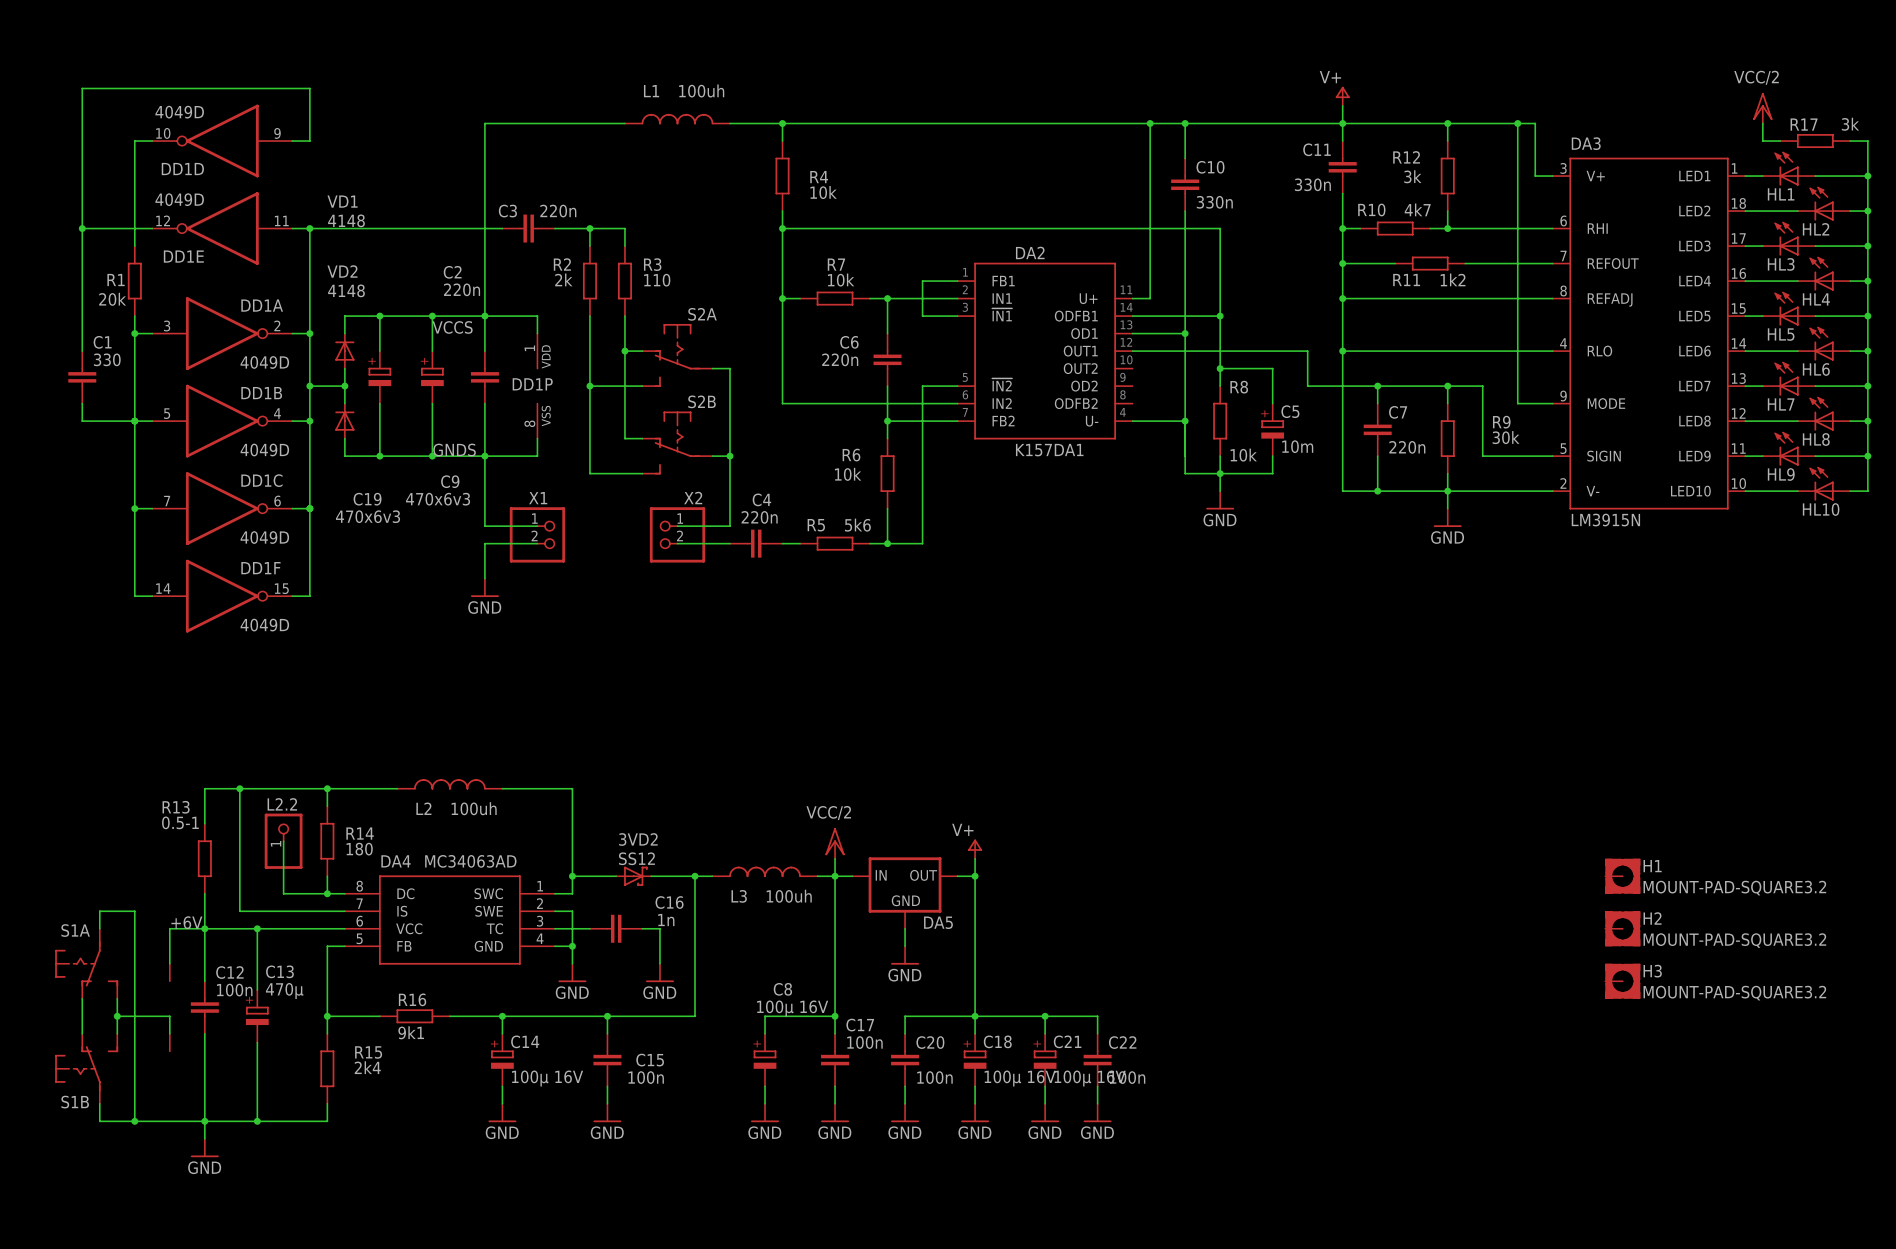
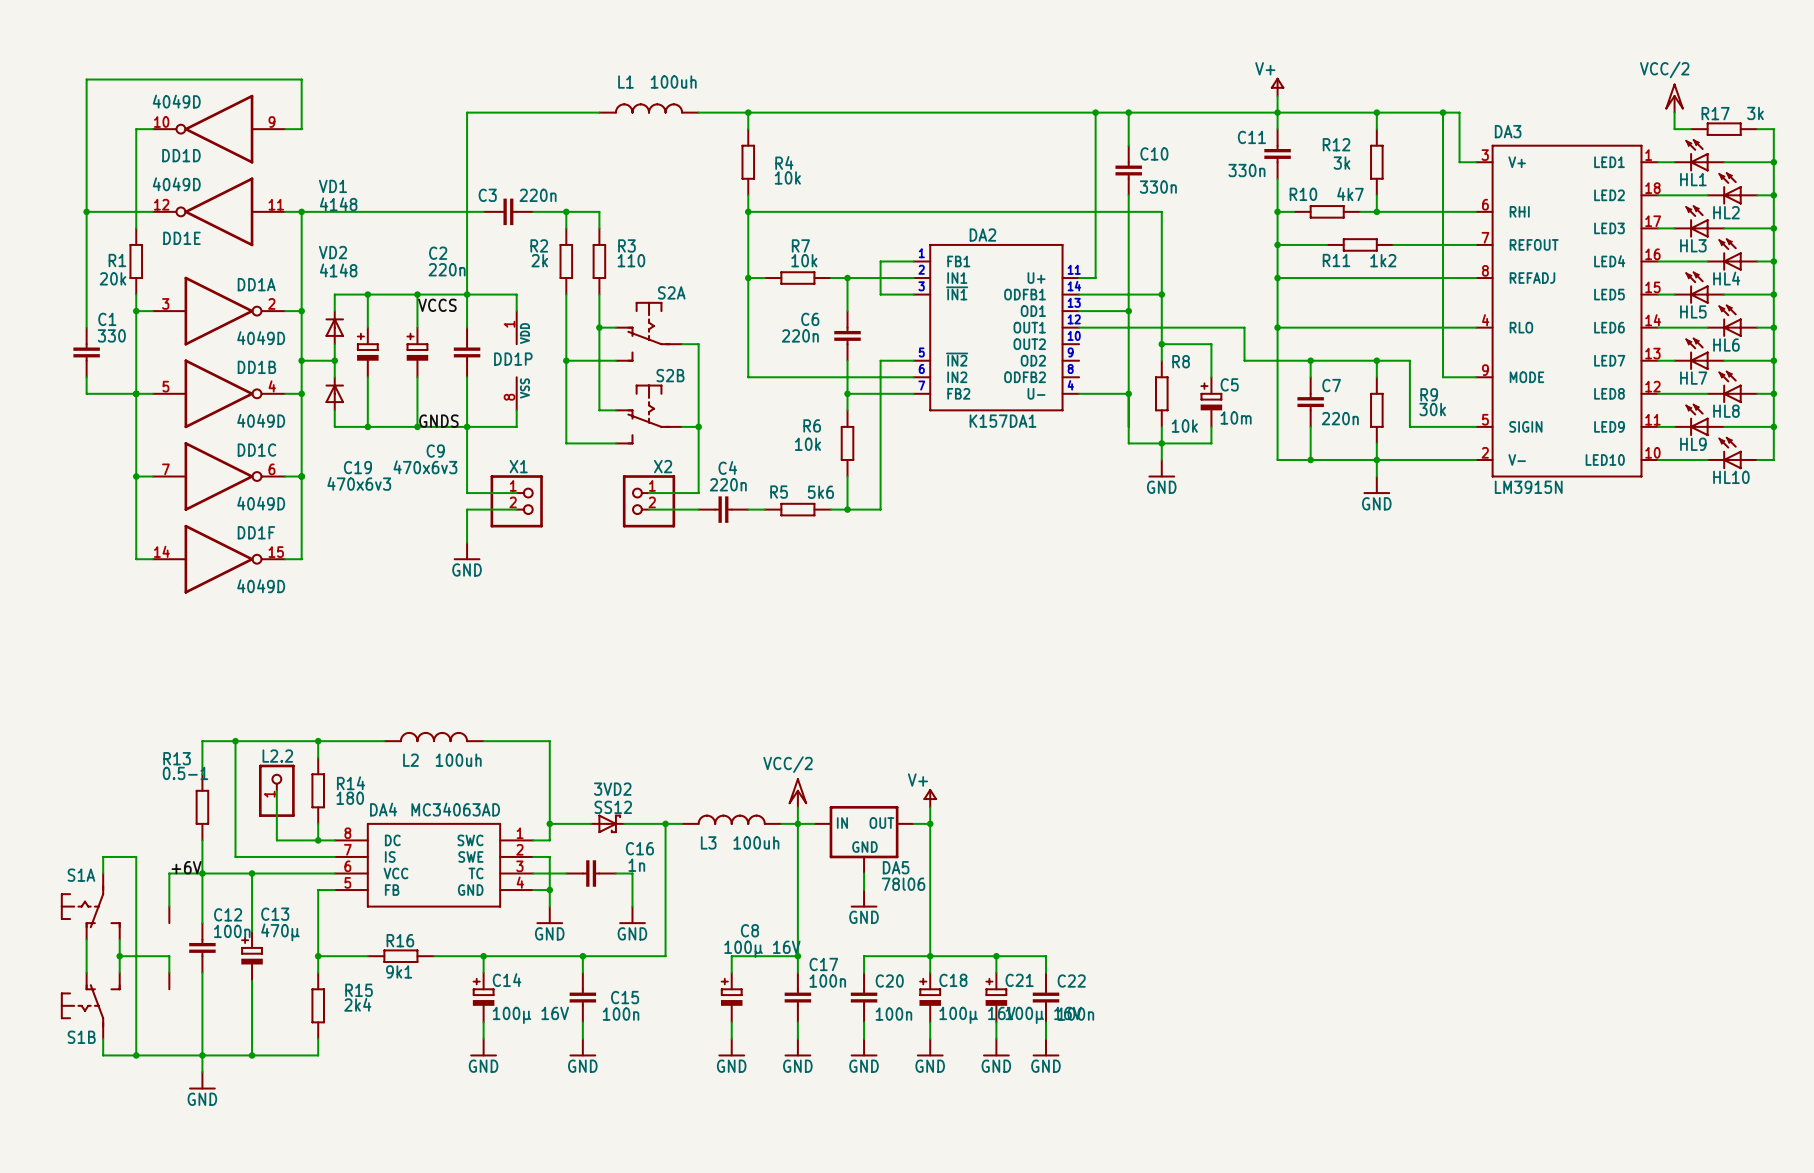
H1: MOUNT-PAD-SQUARE3.2 (1622, 876) -> none
H2: MOUNT-PAD-SQUARE3.2 (1622, 928) -> none
DA5 value: none -> 78l06 (903, 884)
H3: MOUNT-PAD-SQUARE3.2 (1622, 981) -> none

